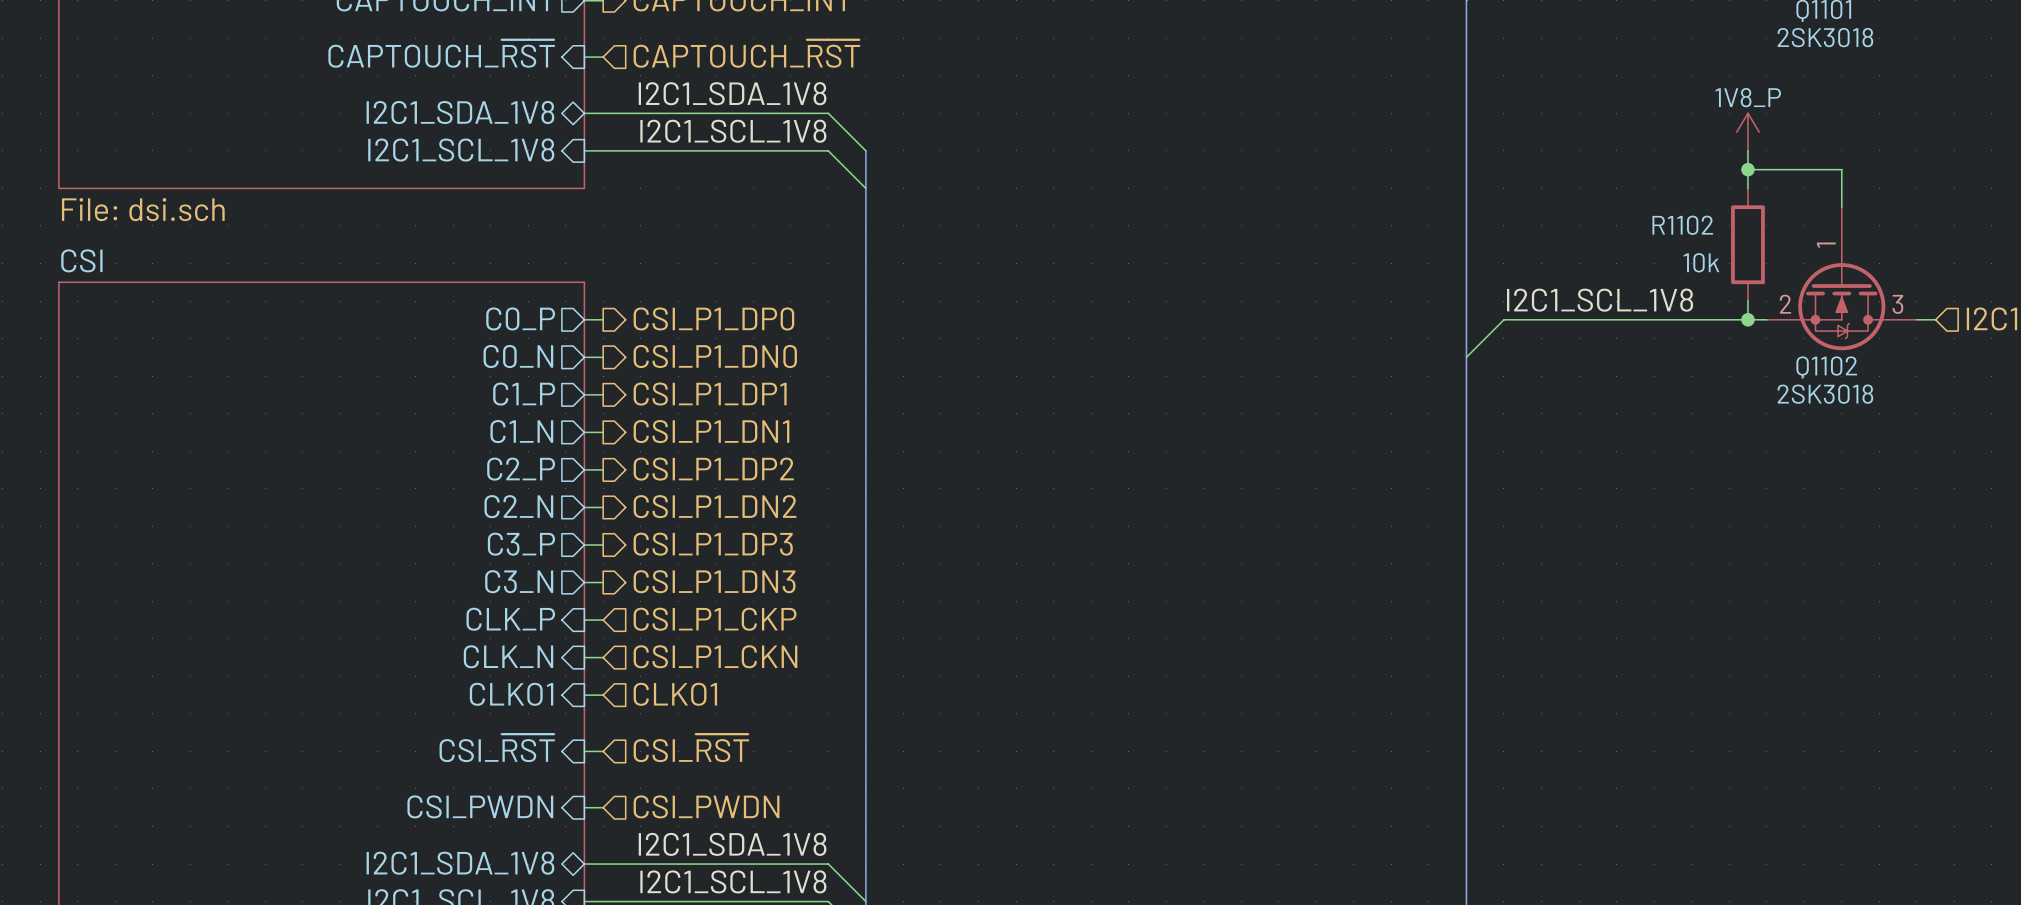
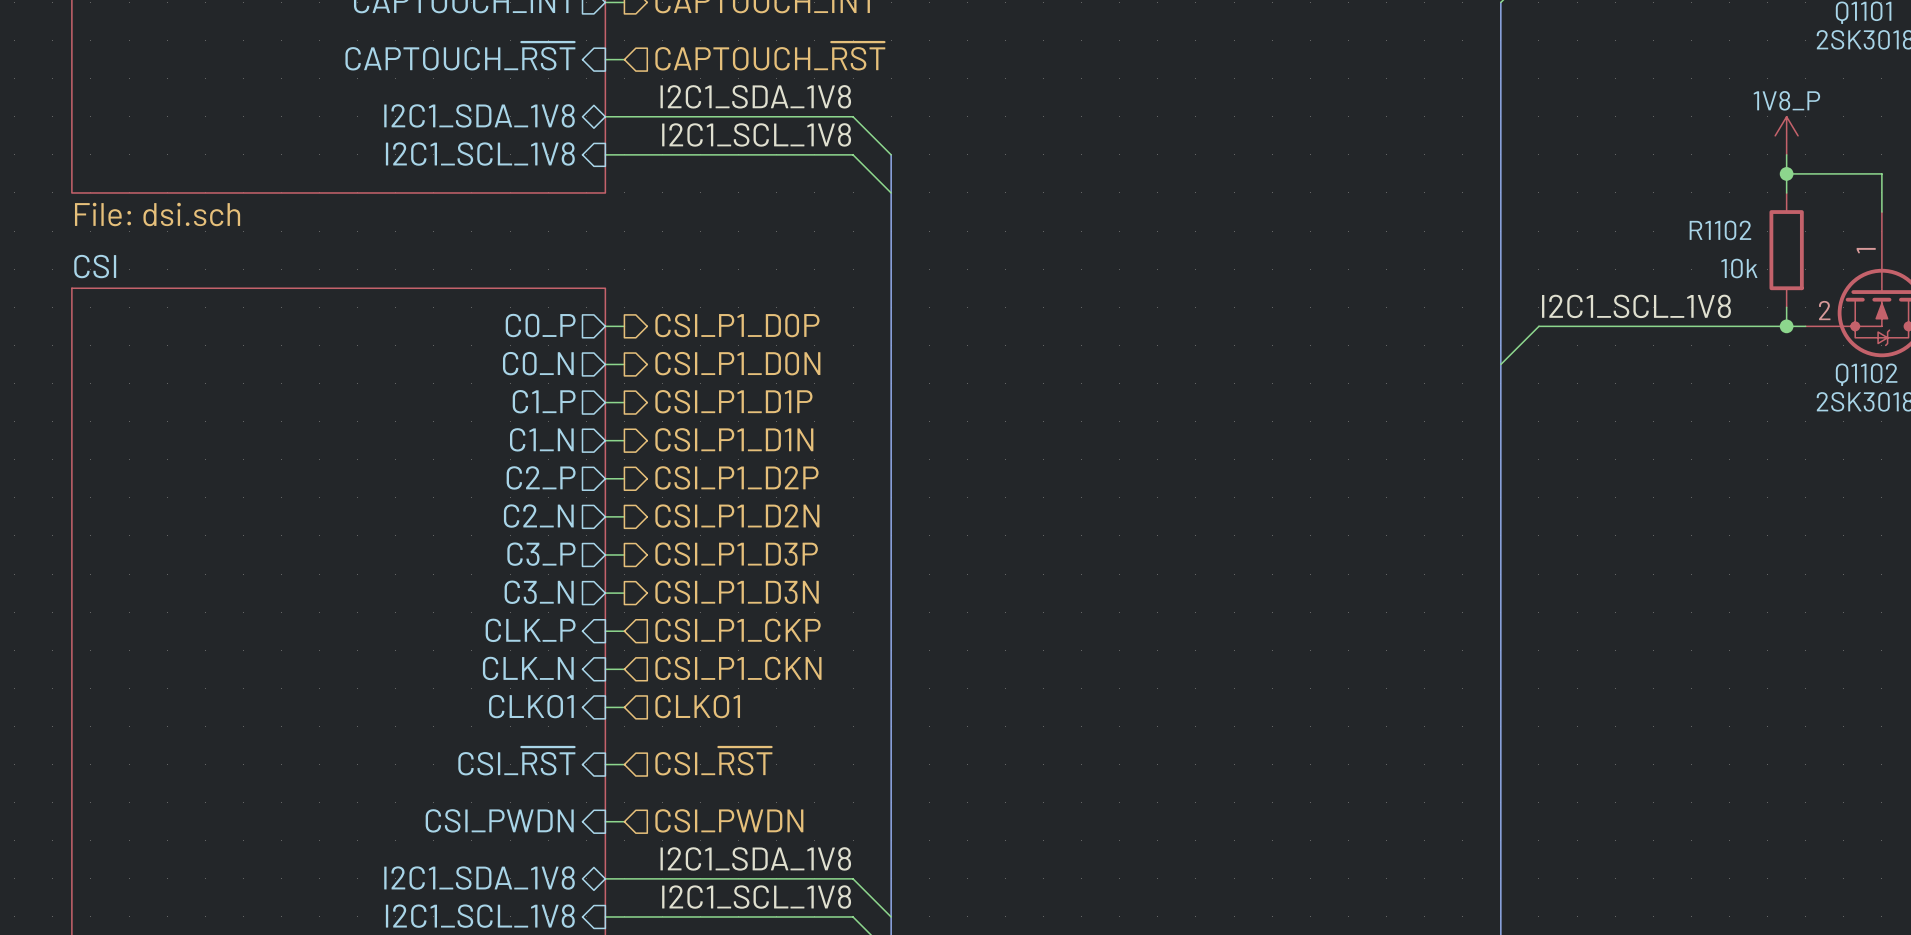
hierarchical label: CSI_P1_DP0 (713, 318) -> CSI_P1_D0P (737, 325)
hierarchical label: CSI_P1_DN0 (715, 356) -> CSI_P1_D0N (737, 363)
hierarchical label: CSI_P1_DP1 (710, 394) -> CSI_P1_D1P (733, 401)
hierarchical label: CSI_P1_DN1 (711, 431) -> CSI_P1_D1N (734, 439)
hierarchical label: CSI_P1_DP2 (713, 469) -> CSI_P1_D2P (736, 477)
hierarchical label: CSI_P1_DN2 (715, 506) -> CSI_P1_D2N (737, 516)
hierarchical label: CSI_P1_DP3 (713, 544) -> CSI_P1_D3P (736, 554)
hierarchical label: CSI_P1_DN3 (714, 581) -> CSI_P1_D3N (737, 592)

